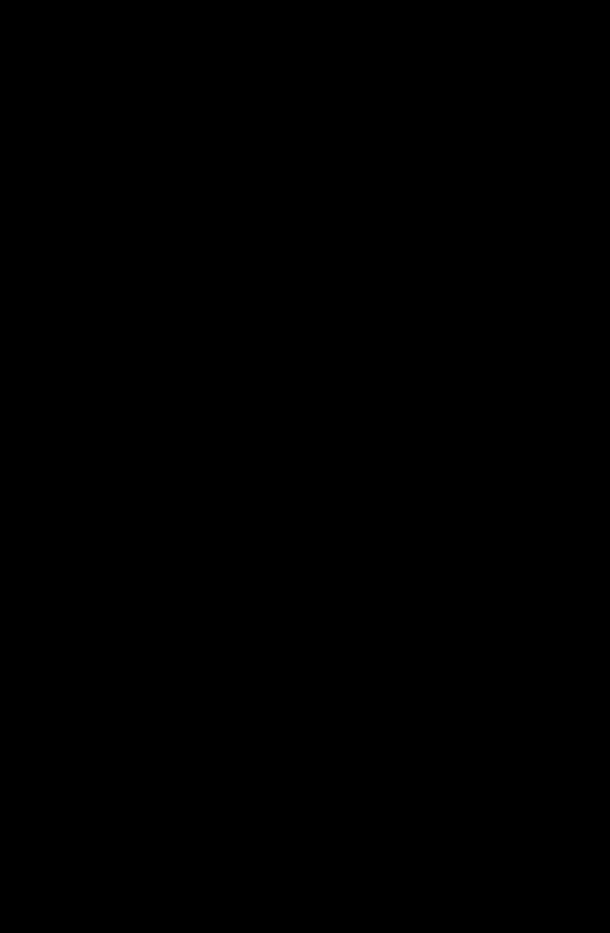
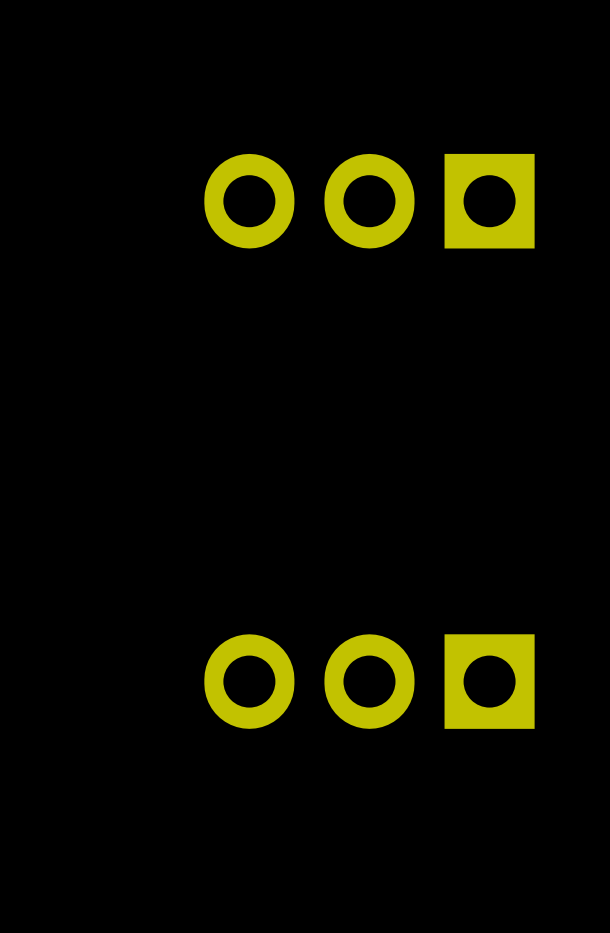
part: none -> (369, 201)
part: none -> (369, 681)

